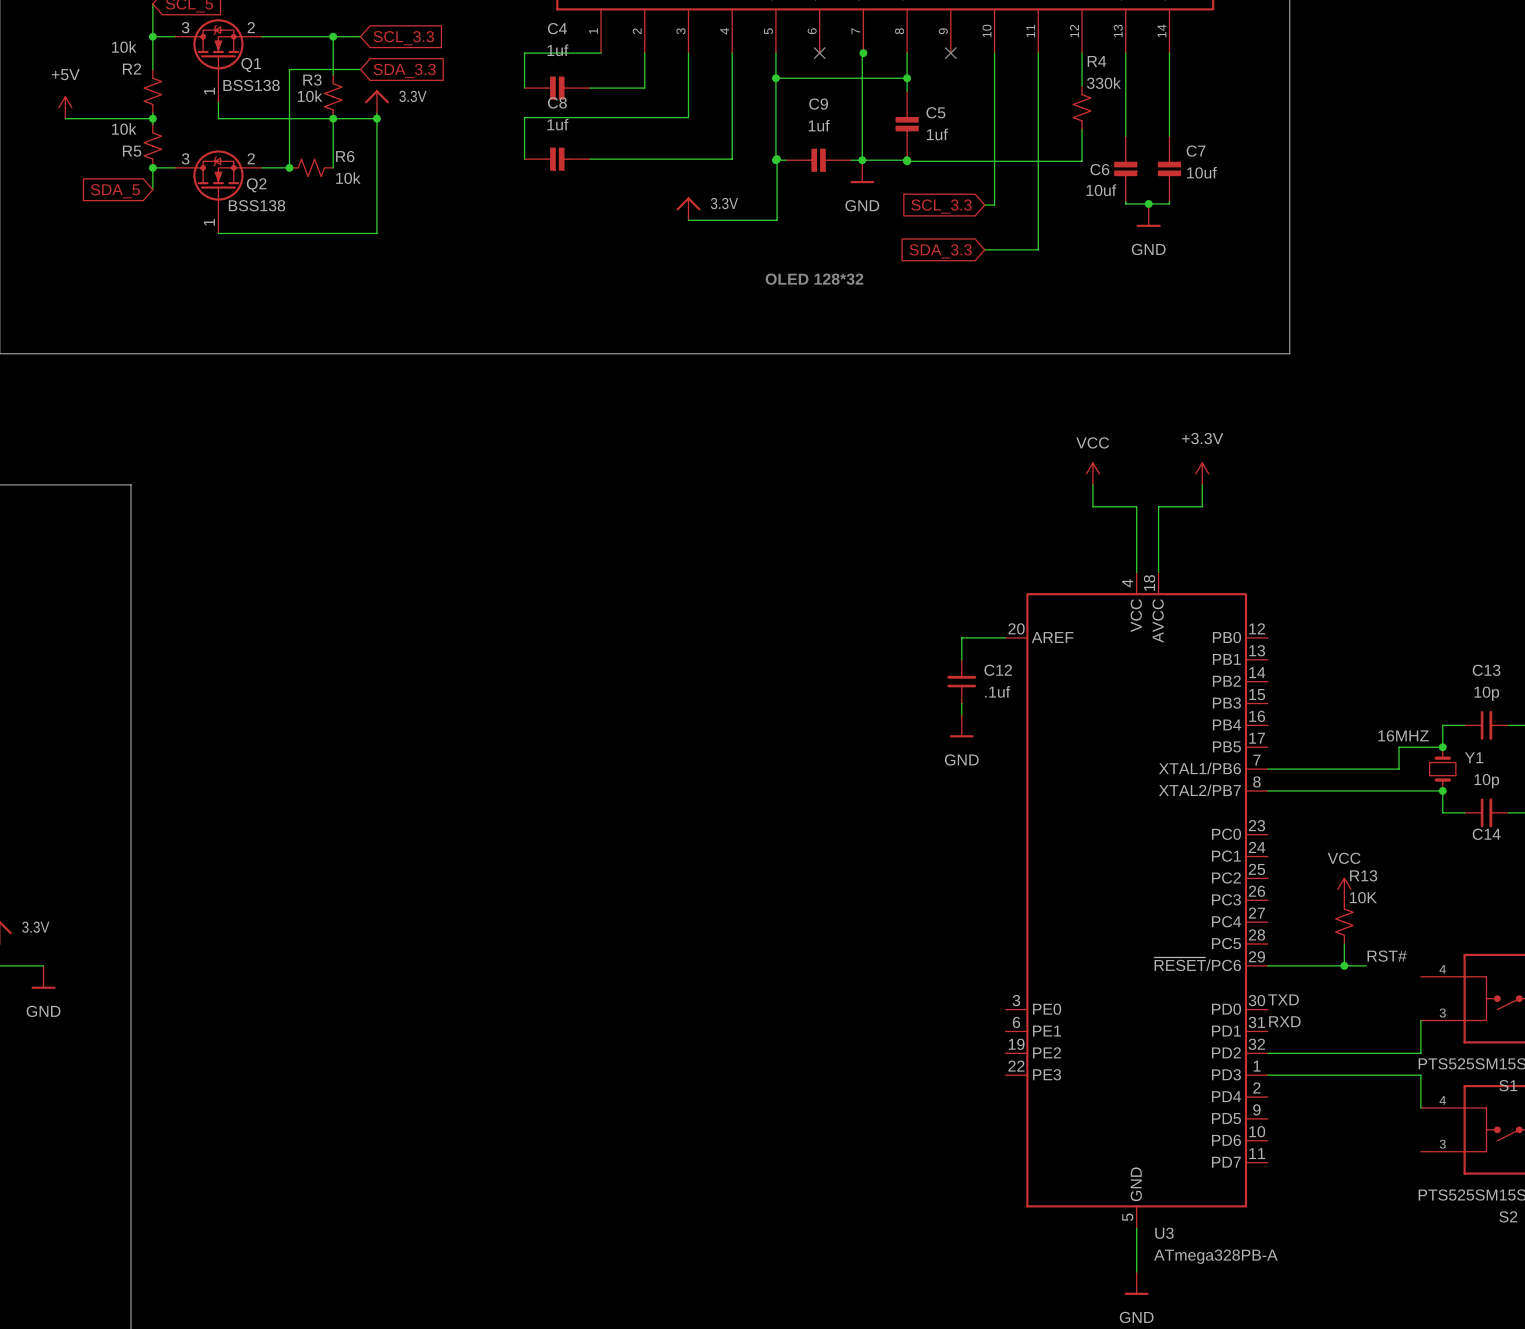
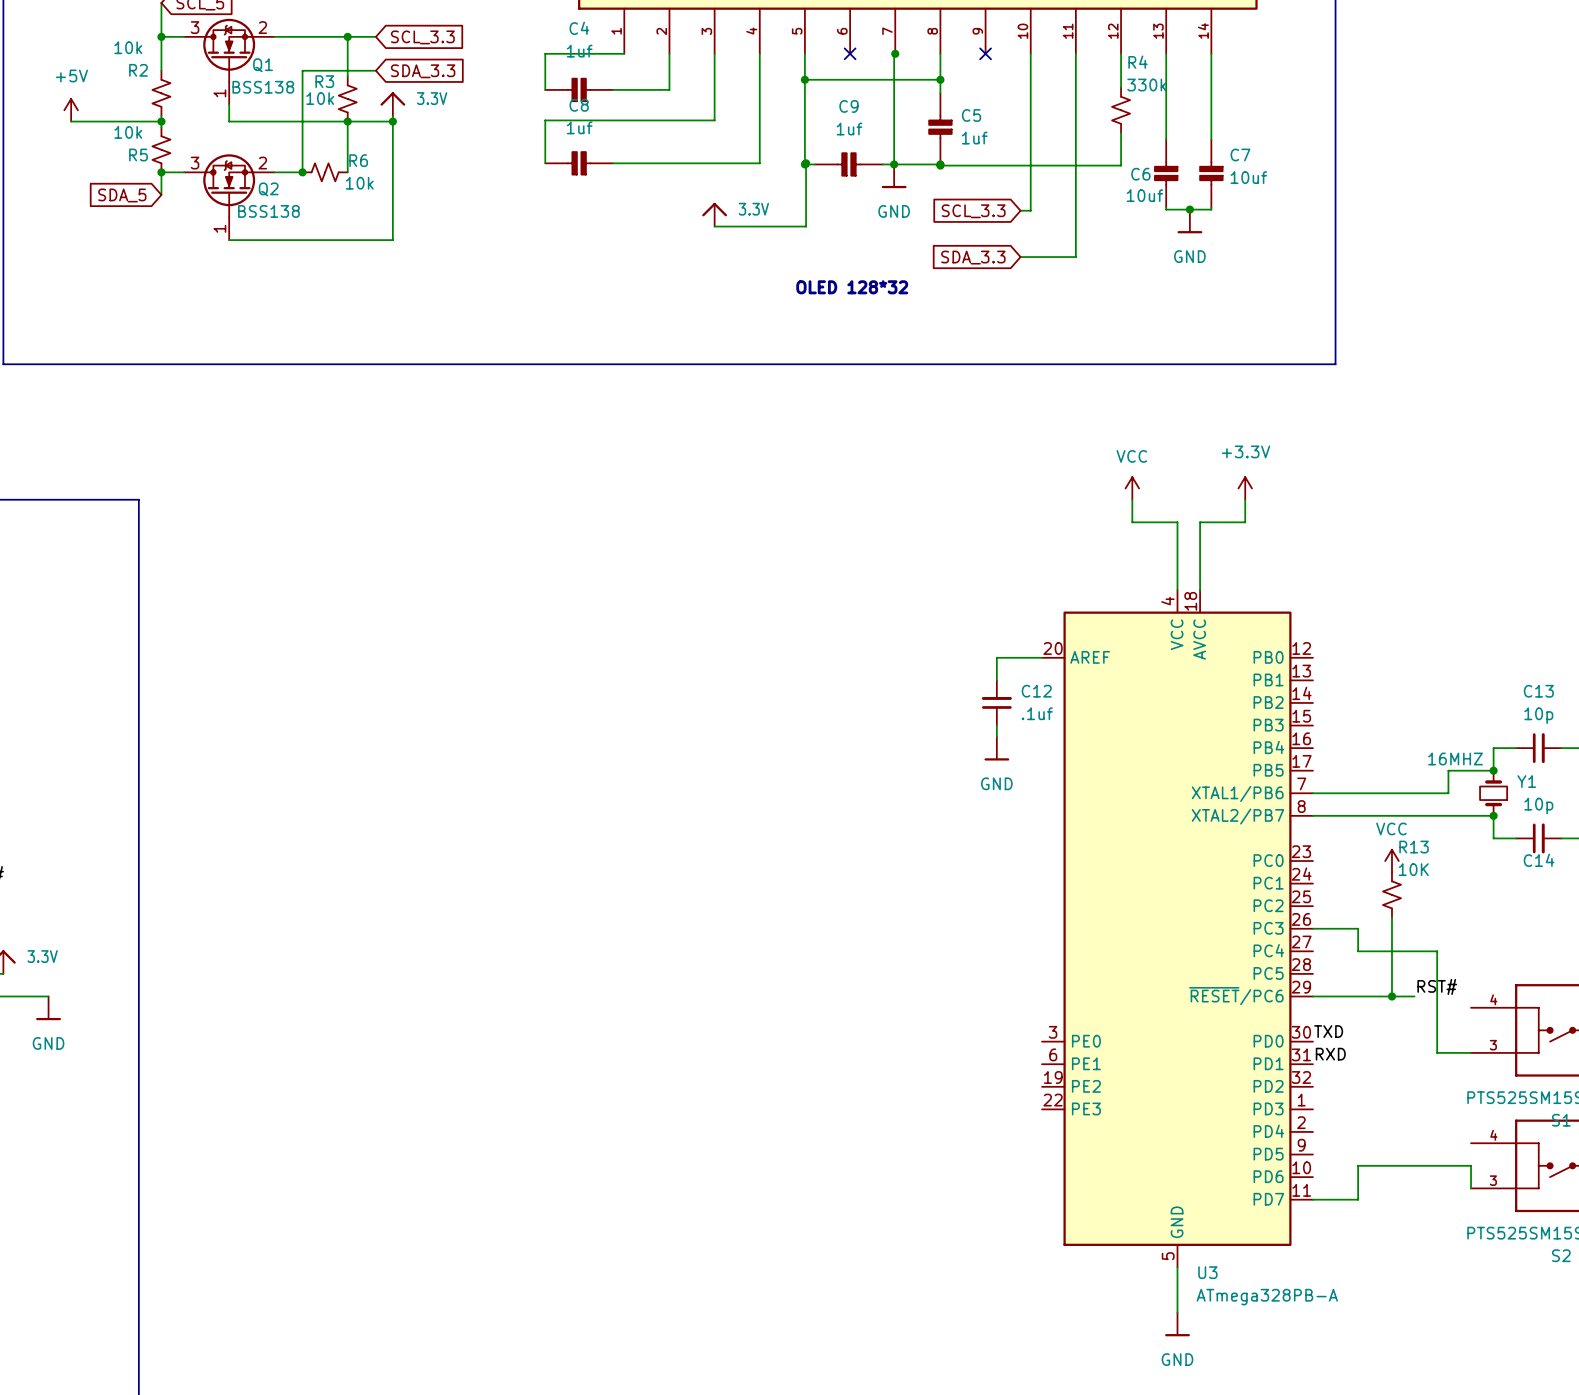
power symbol position: VCC (1344, 889) -> VCC (1391, 861)
R13 position: (1344, 922) -> (1391, 894)
wire: (1420, 1020) (1420, 1053) (1267, 1053) -> (1471, 1052) (1437, 1052) (1437, 951) (1358, 951) (1358, 928) (1312, 928)
wire: (1267, 1075) (1420, 1075) (1420, 1107) -> none
wire: none -> (1471, 1188) (1471, 1165) (1358, 1165) (1358, 1199) (1312, 1199)

